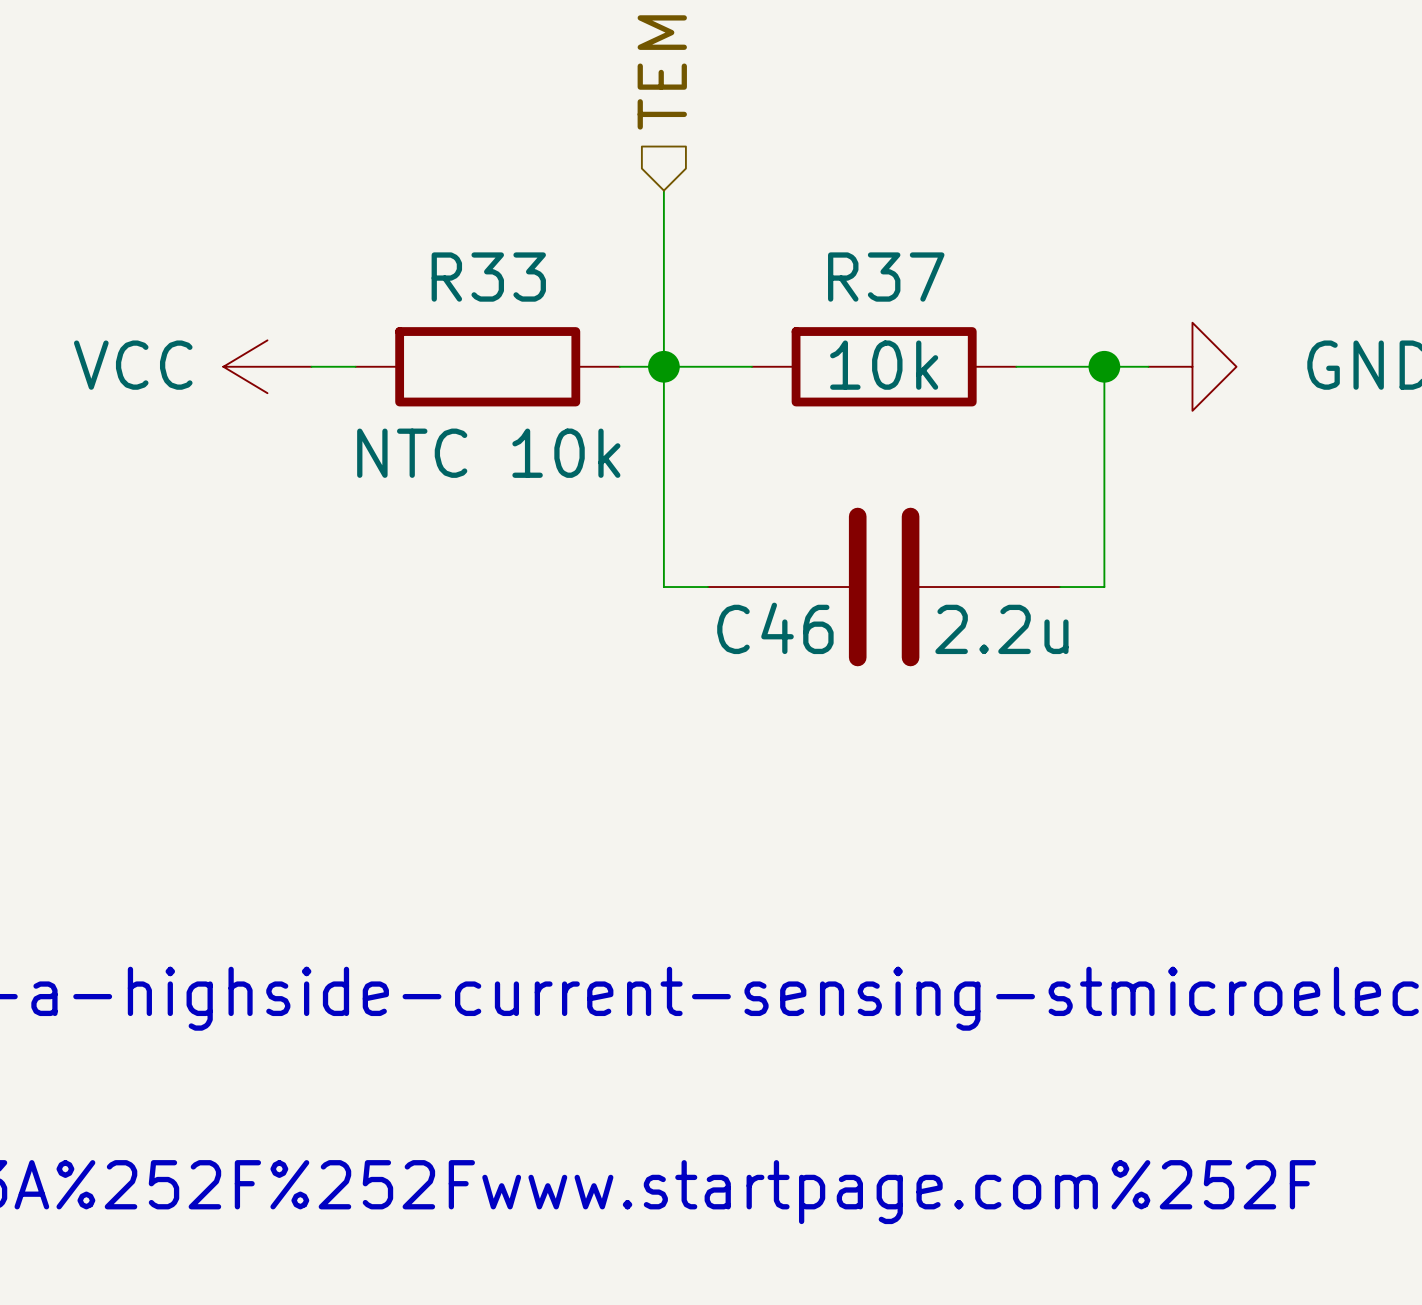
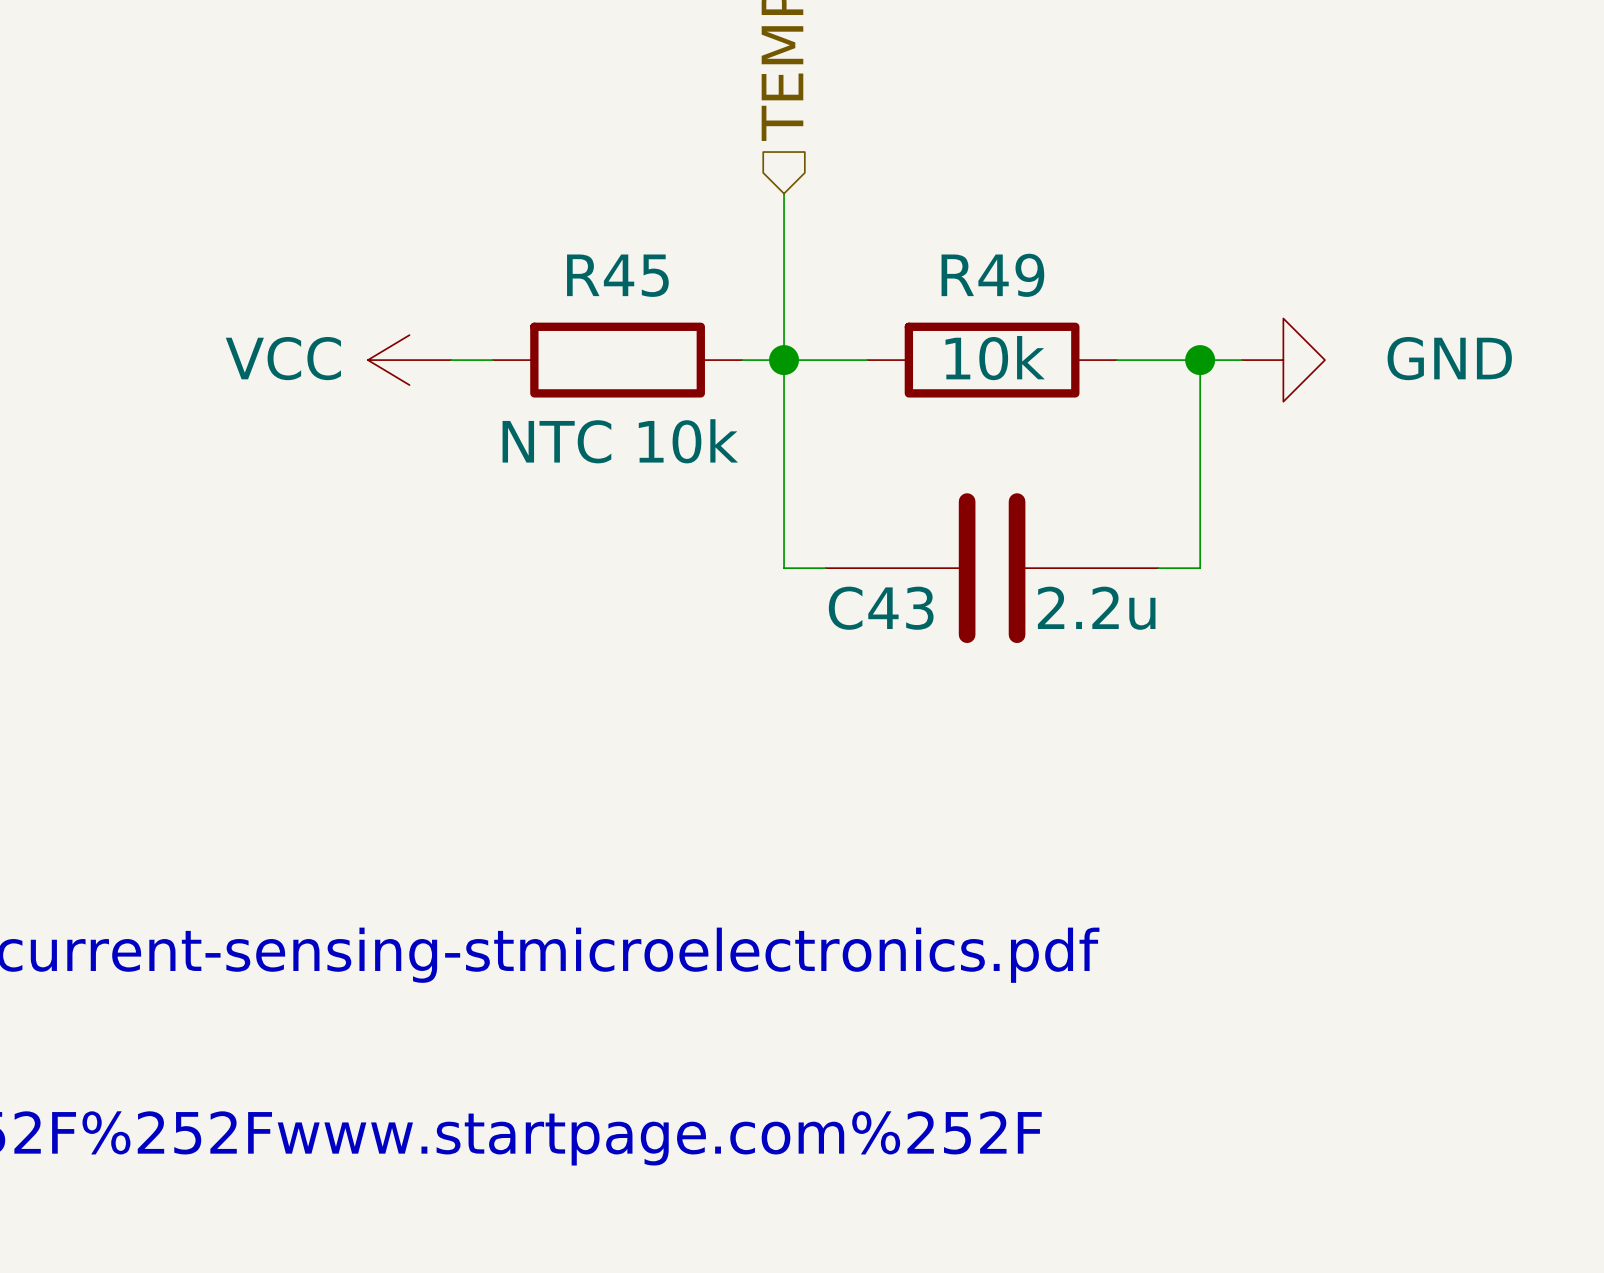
R33 name: R33 (488, 277) -> R45 (617, 275)
R37 name: R37 (886, 277) -> R49 (992, 275)
C46 name: C46 (775, 628) -> C43 (881, 608)

